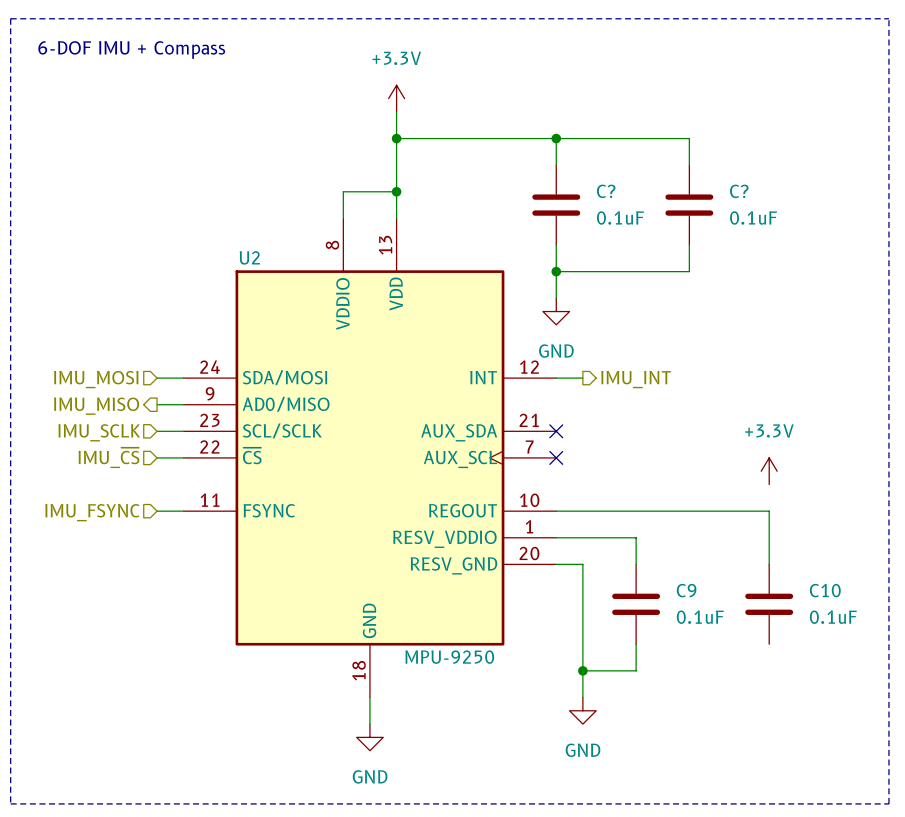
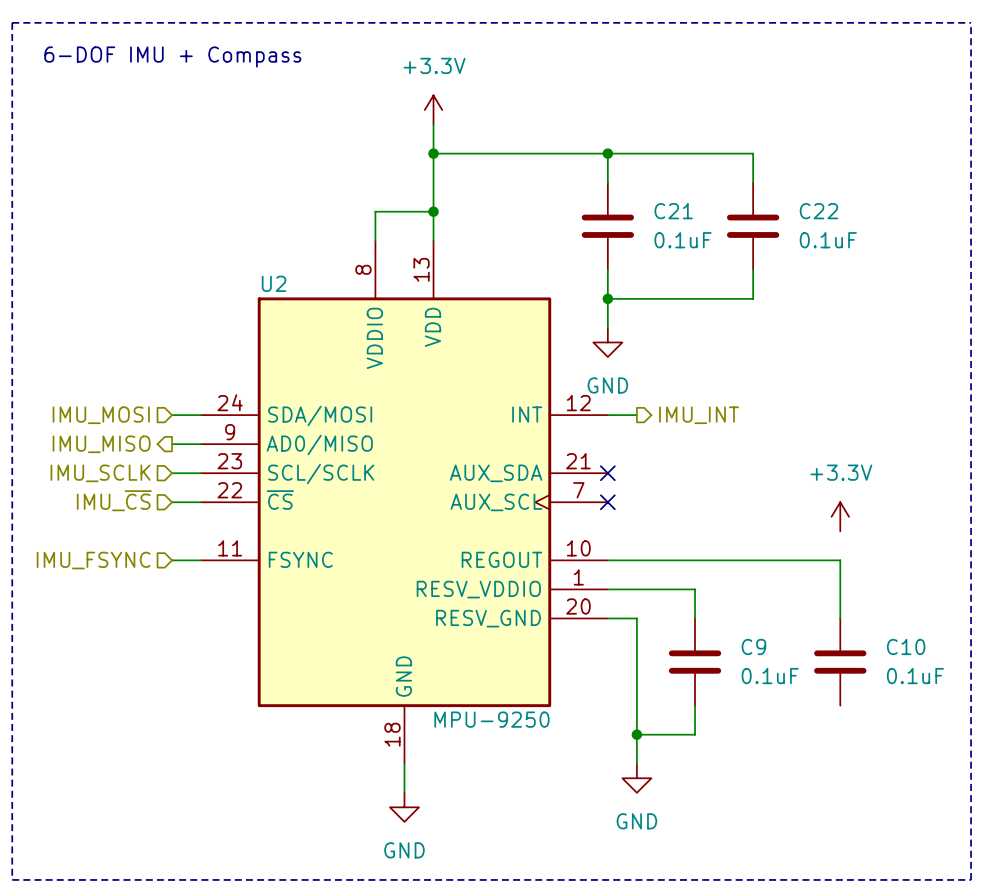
C? name: C? (606, 191) -> C21 (673, 211)
C? name: C? (739, 191) -> C22 (818, 211)

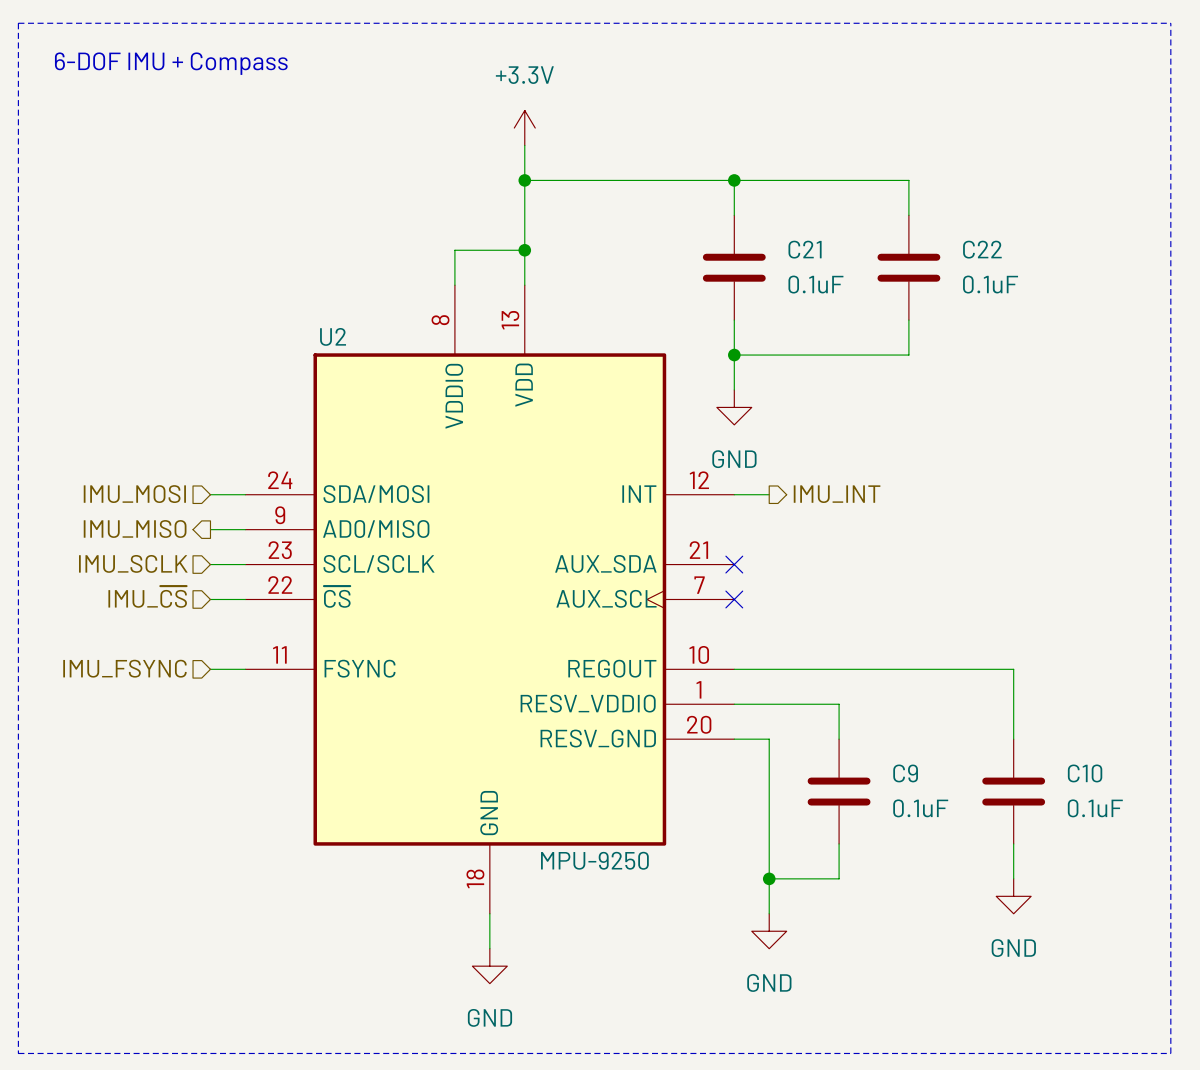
power symbol: +3.3V (840, 516) -> none
wire: none -> (1013, 843) (1013, 878)
power symbol: none -> GND (1013, 896)

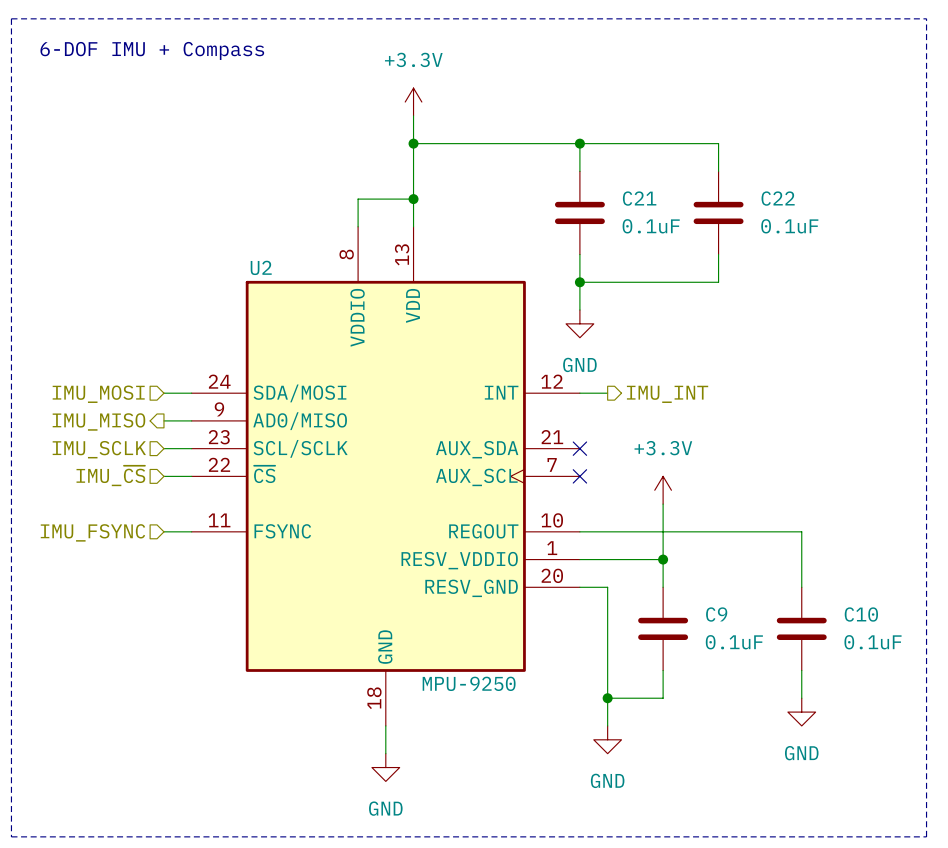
power symbol: none -> +3.3V (663, 490)
wire: none -> (663, 504) (663, 559)
junction: none -> (663, 559)

